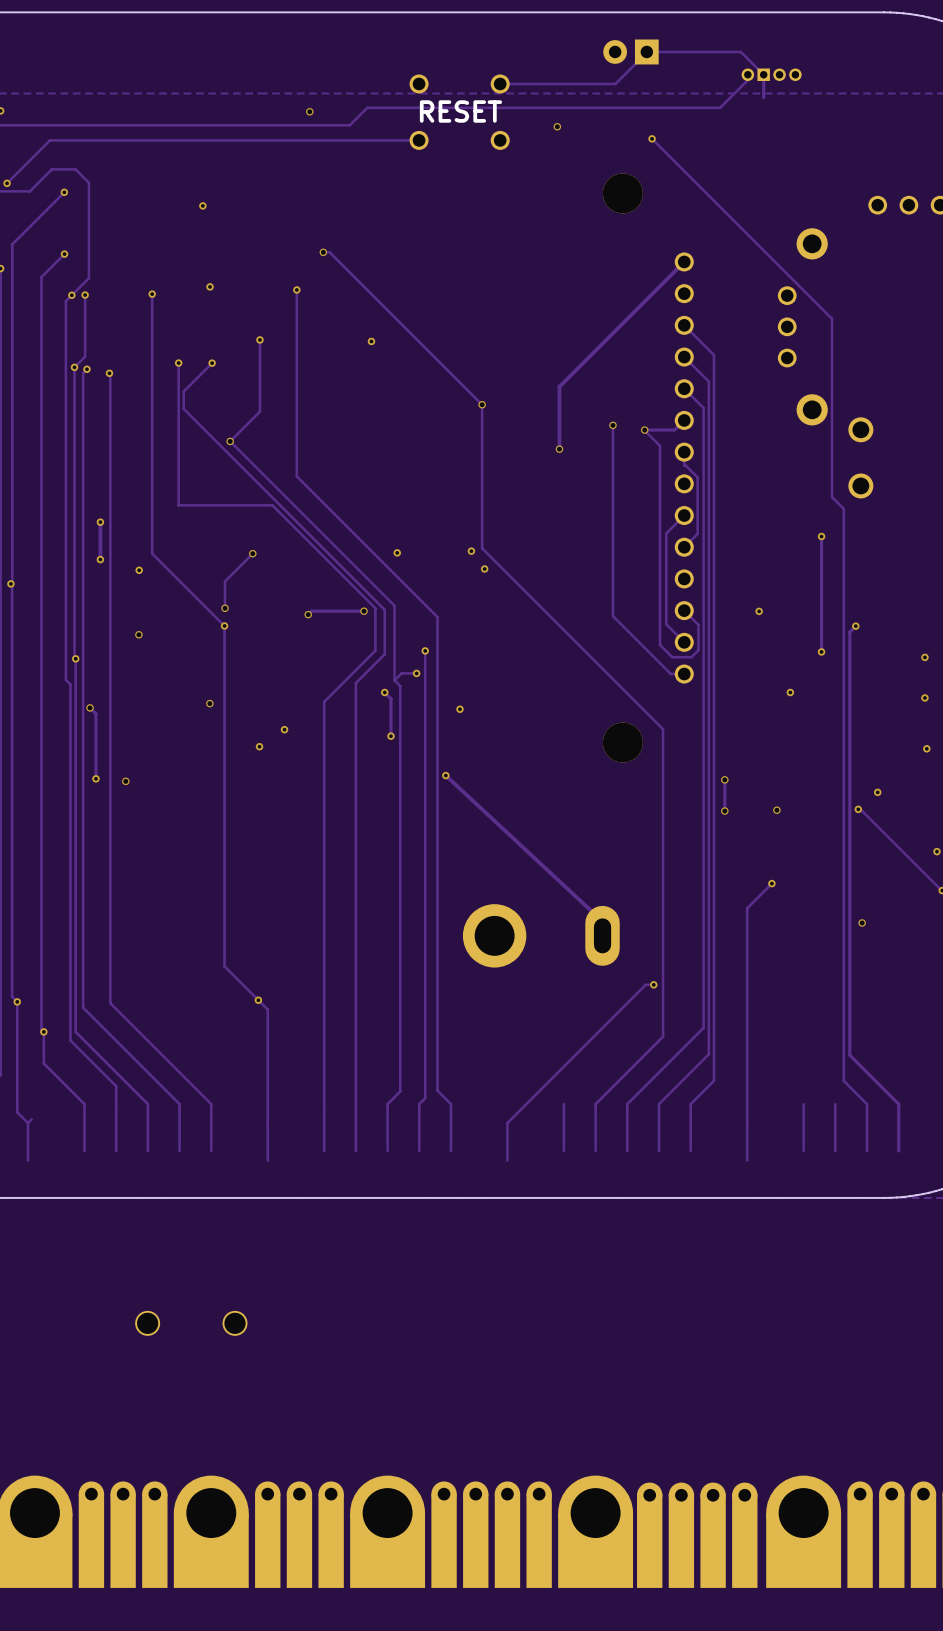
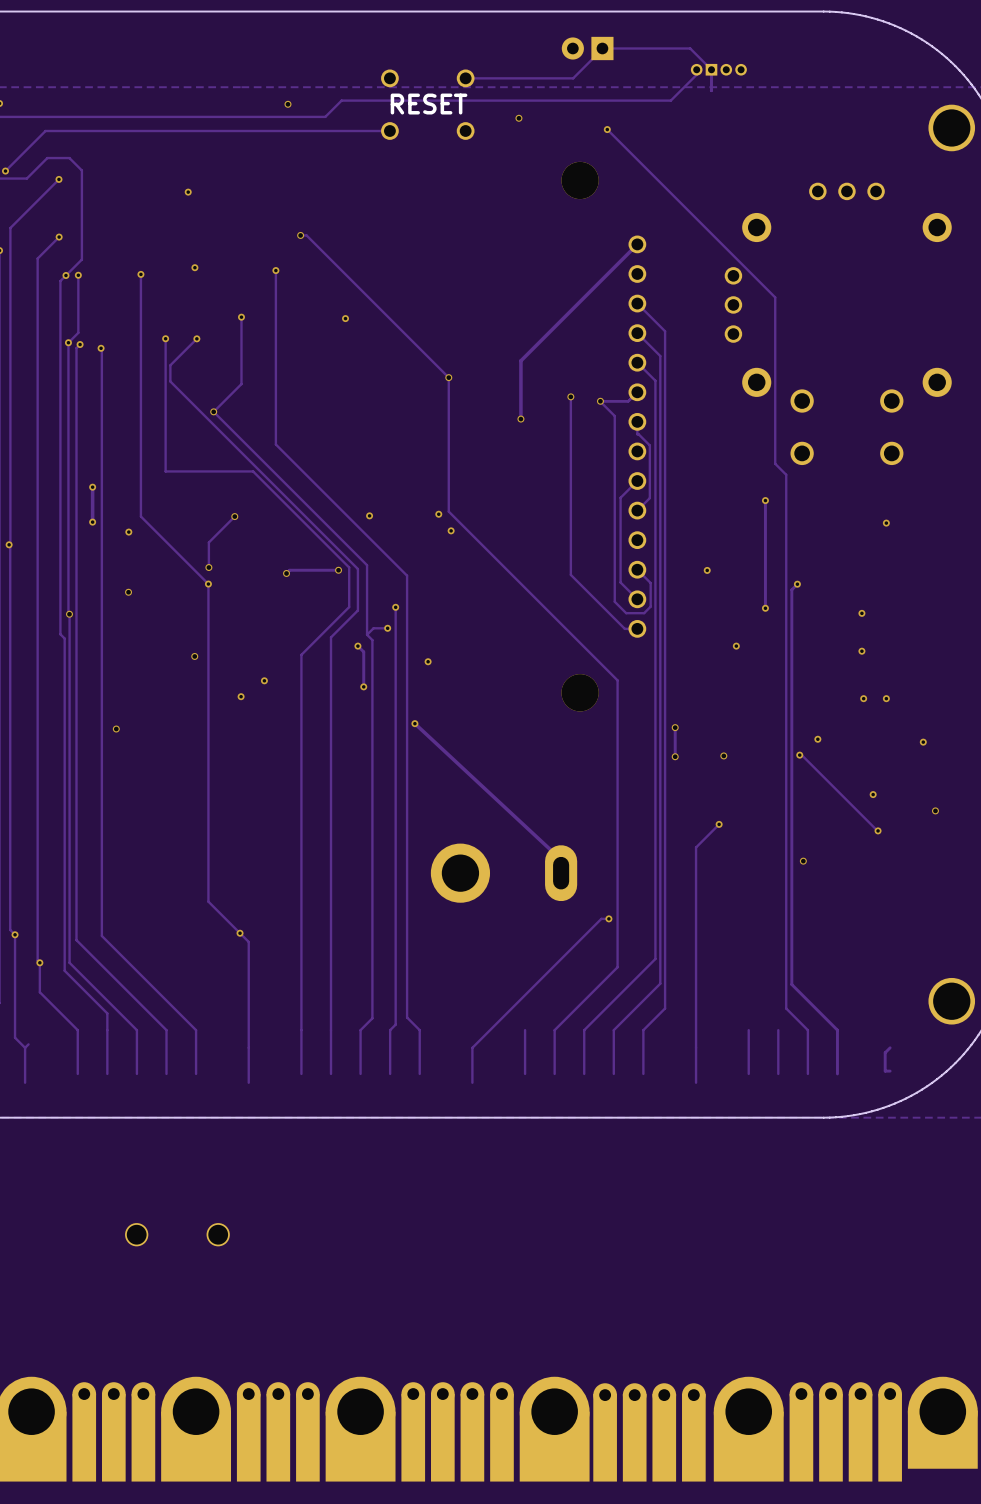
via: (75, 658) -> none
track: (90, 707) (95, 713) (95, 778) -> none
via position: (90, 707) -> (69, 614)
via: (95, 778) -> none

